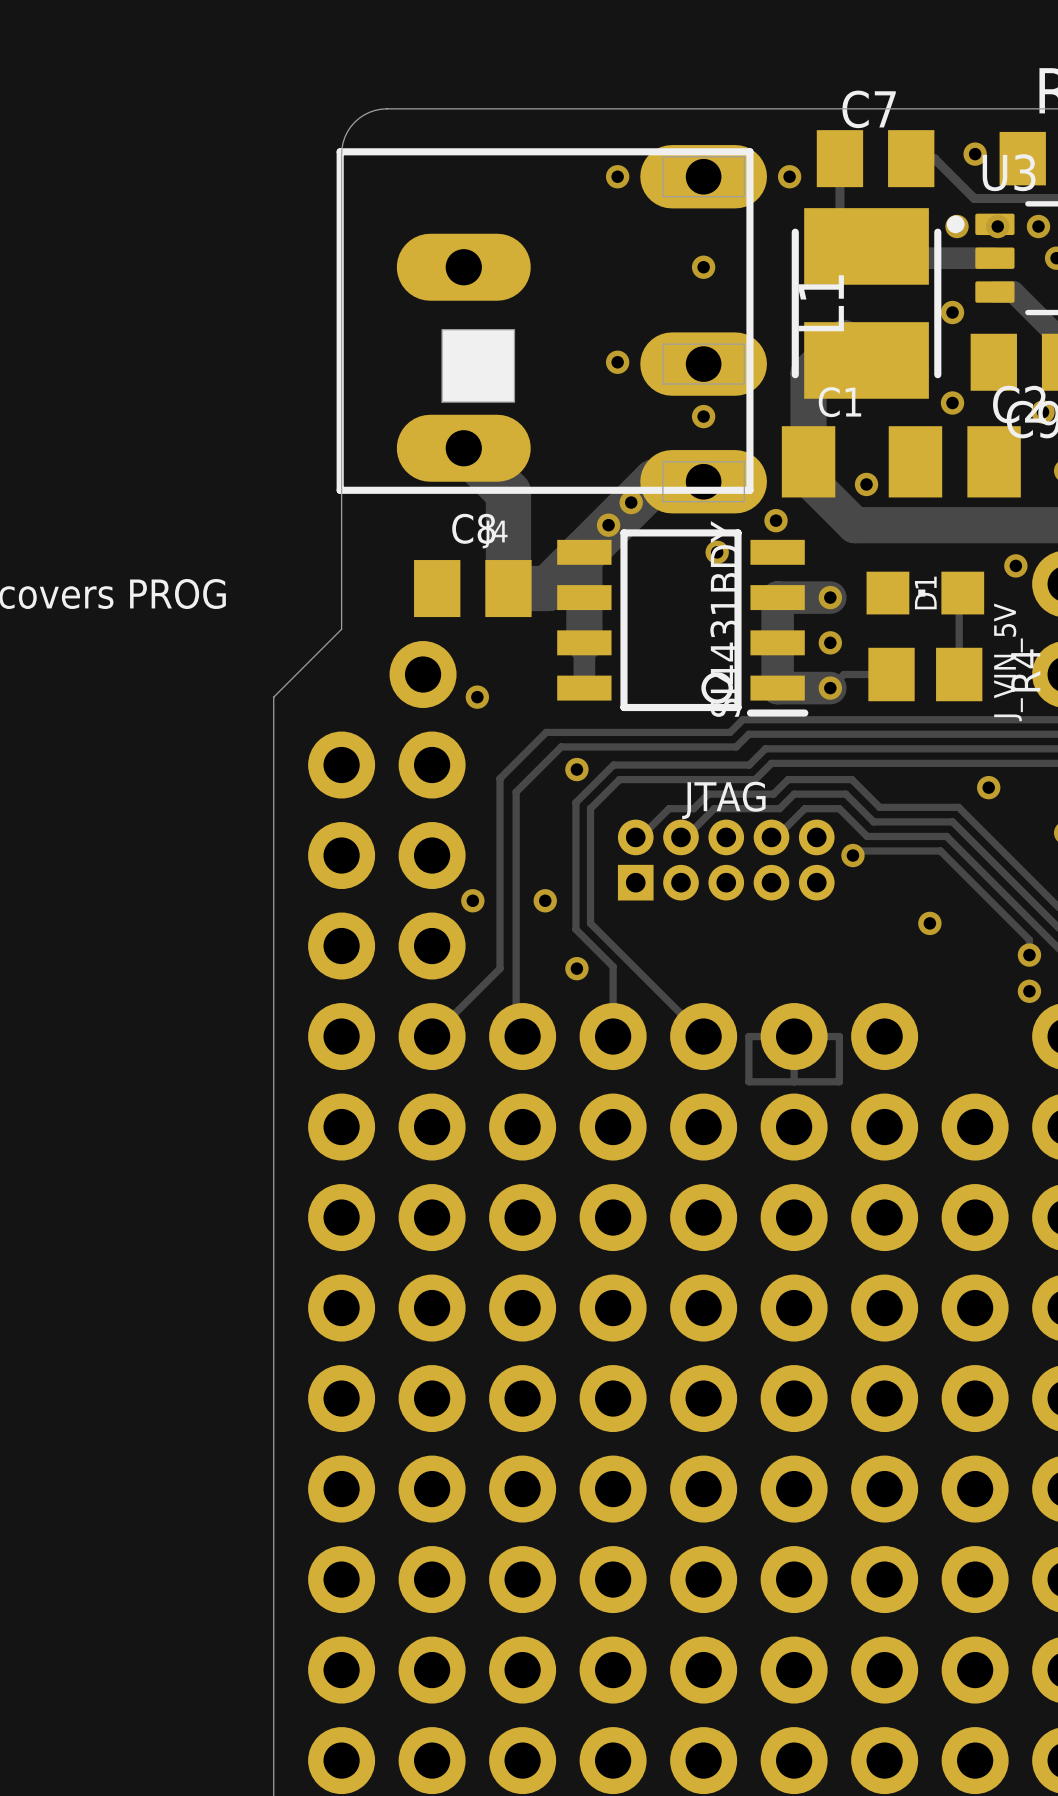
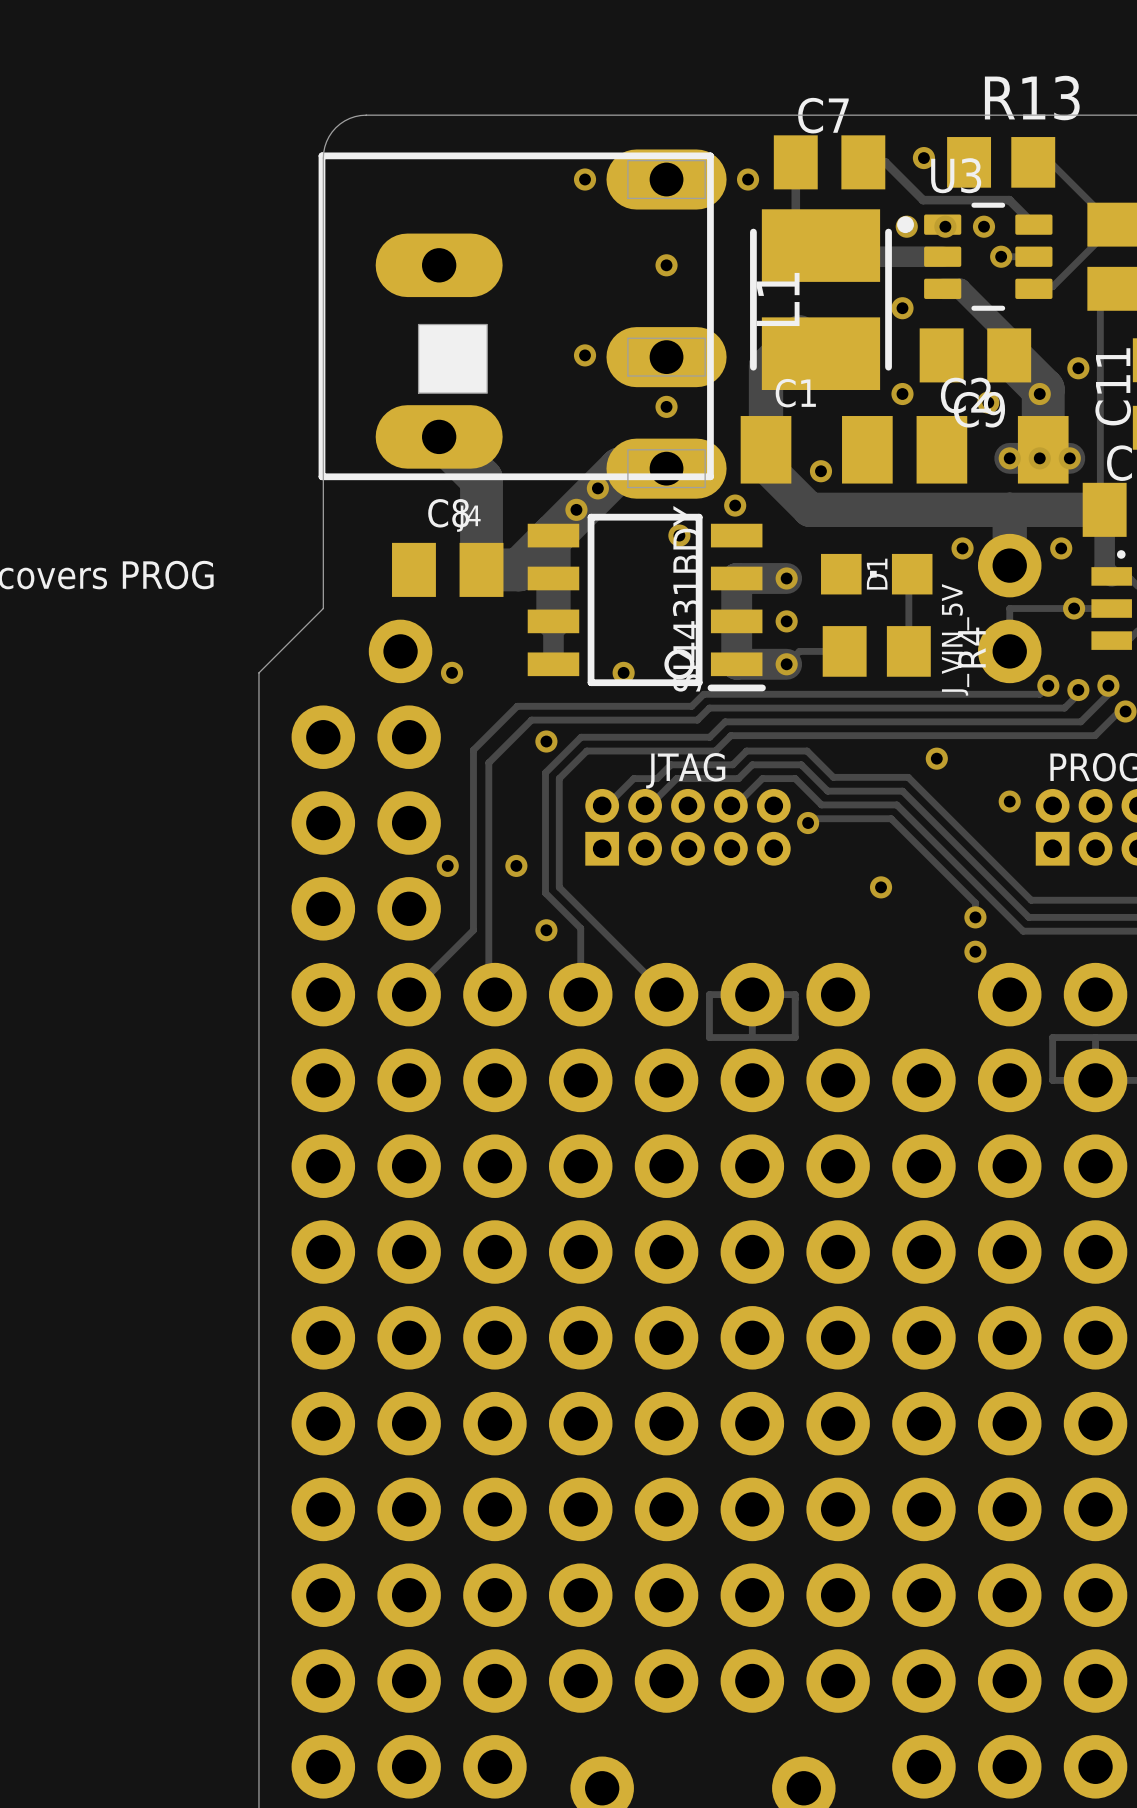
via: none -> (623, 672)

